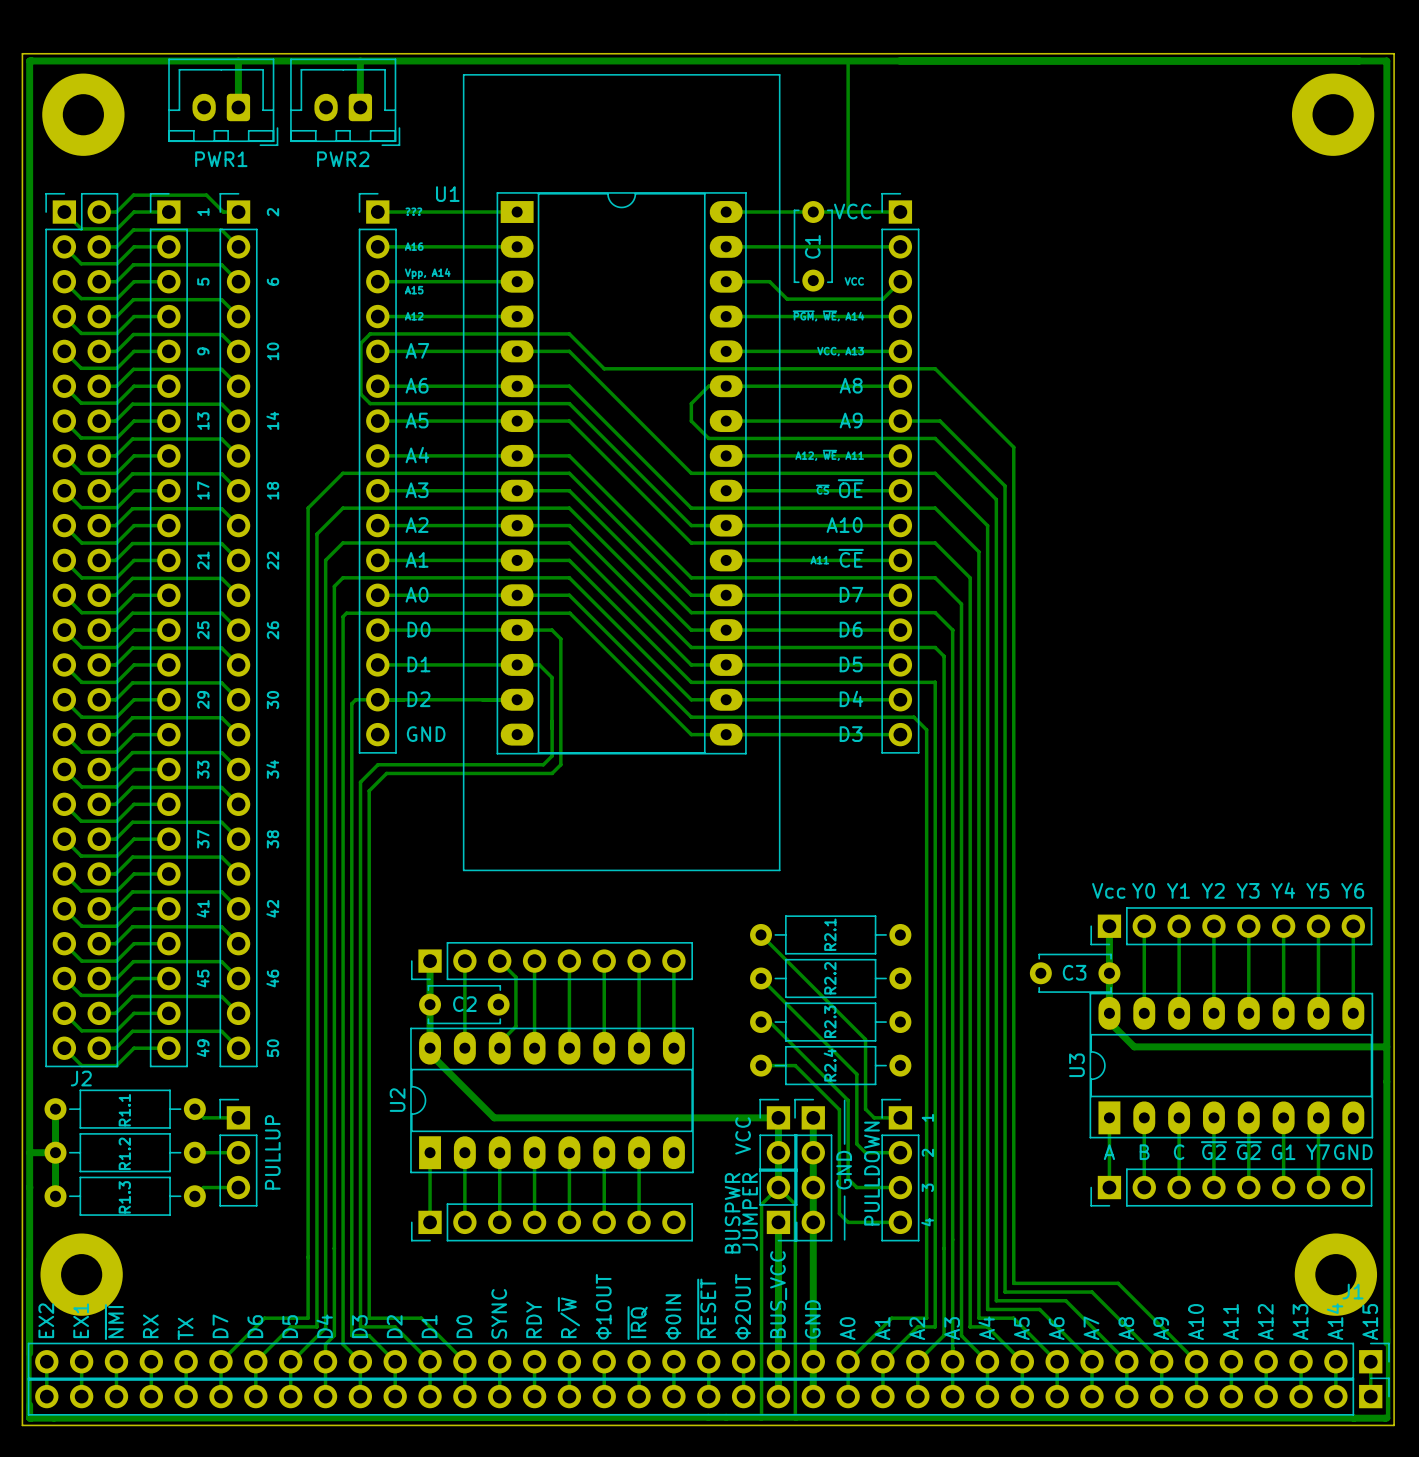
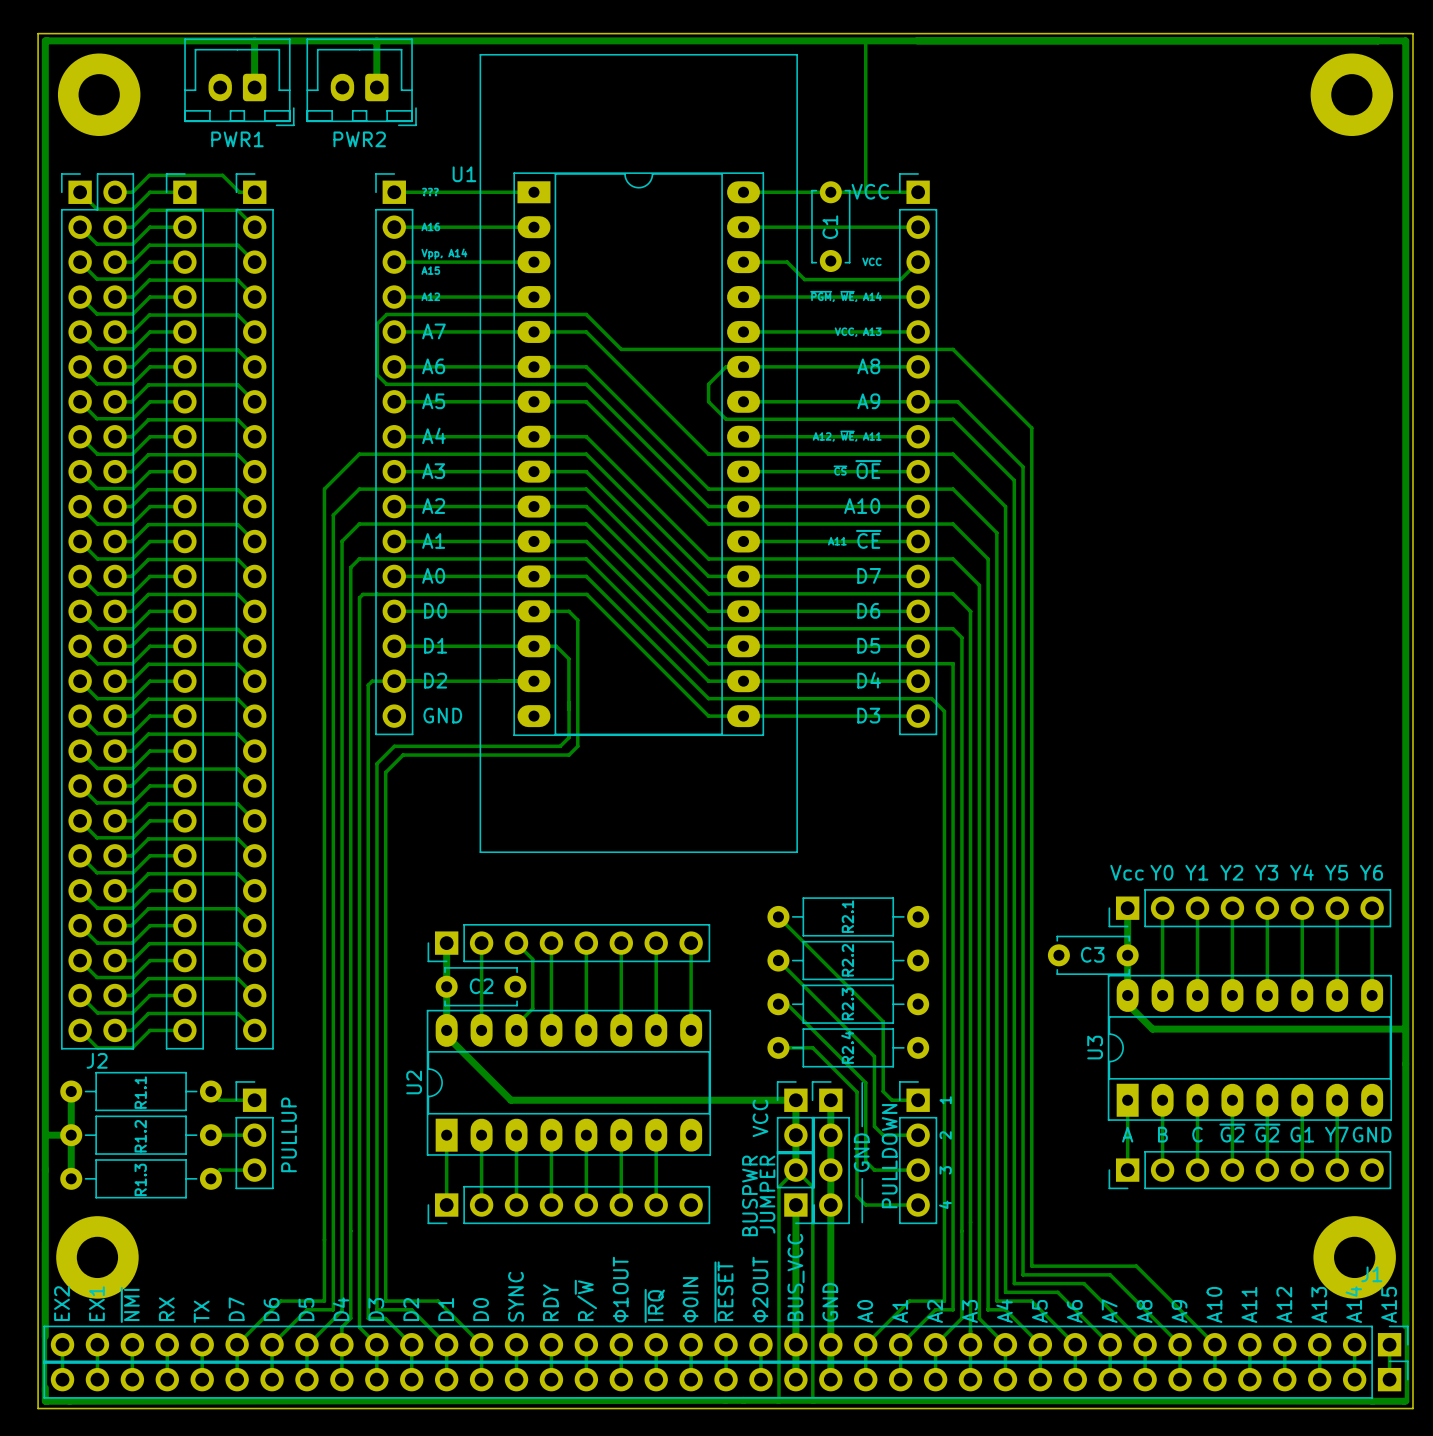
part footprint: [149, 192, 188, 1068] -> [165, 173, 205, 1050]
part footprint: [219, 192, 258, 1068] -> [235, 173, 274, 1050]

